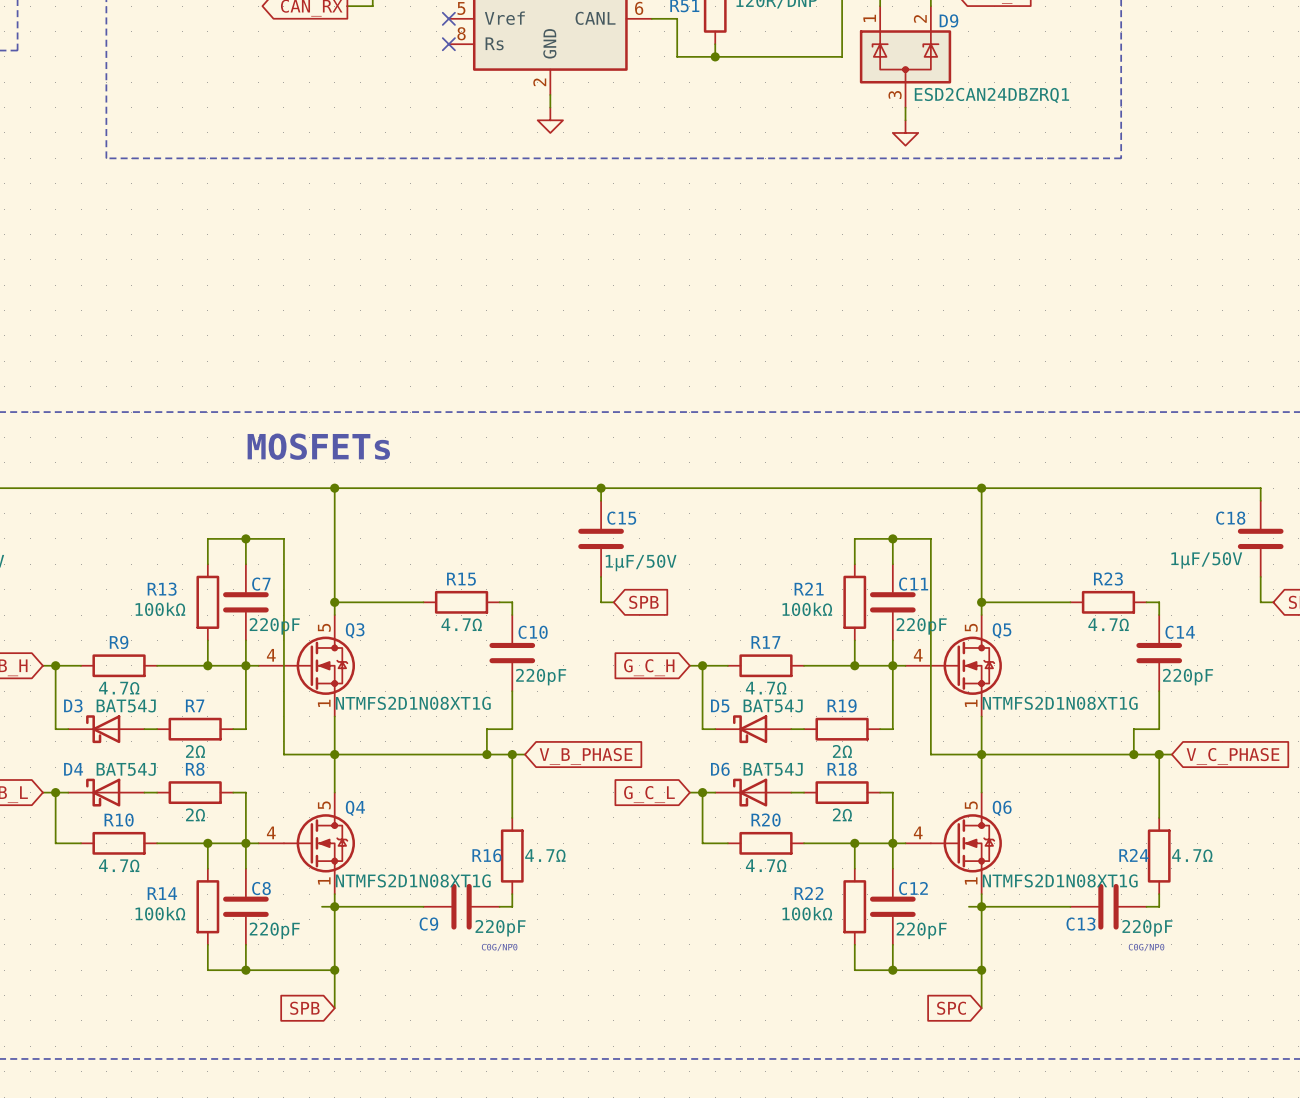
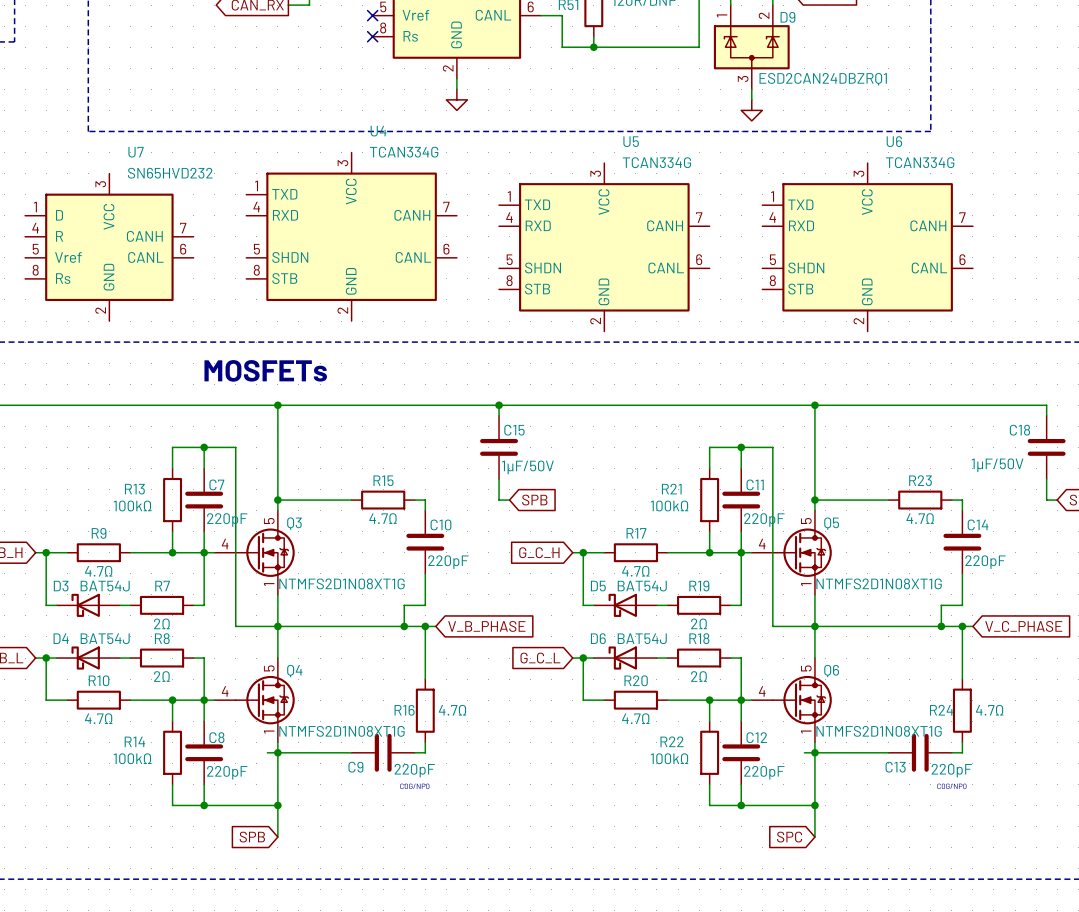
U4: none -> TCAN334G (351, 236)
U7: none -> SN65HVD232 (109, 247)
U5: none -> TCAN334G (604, 247)
U6: none -> TCAN334G (867, 247)

